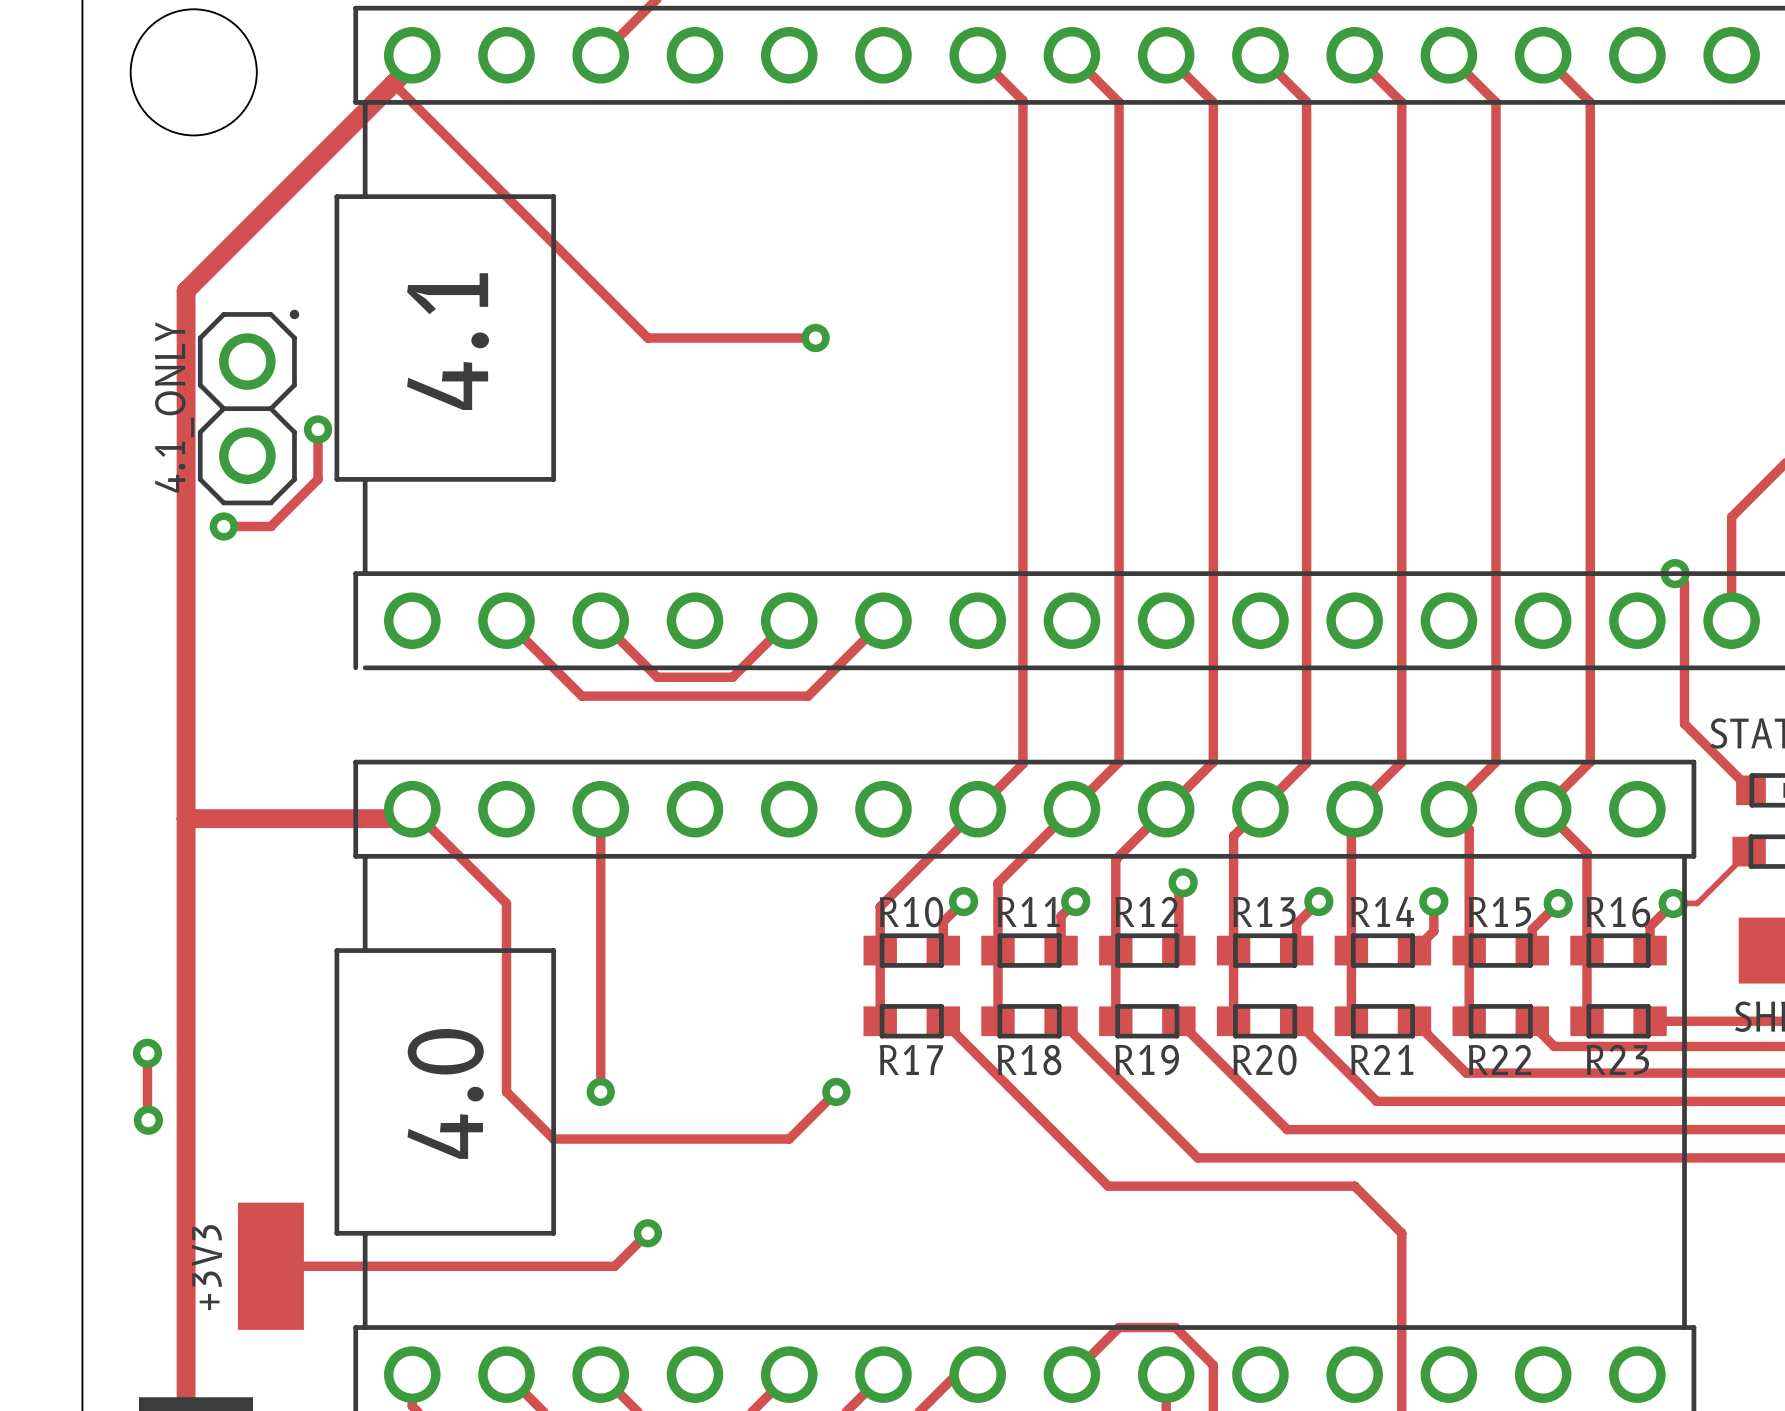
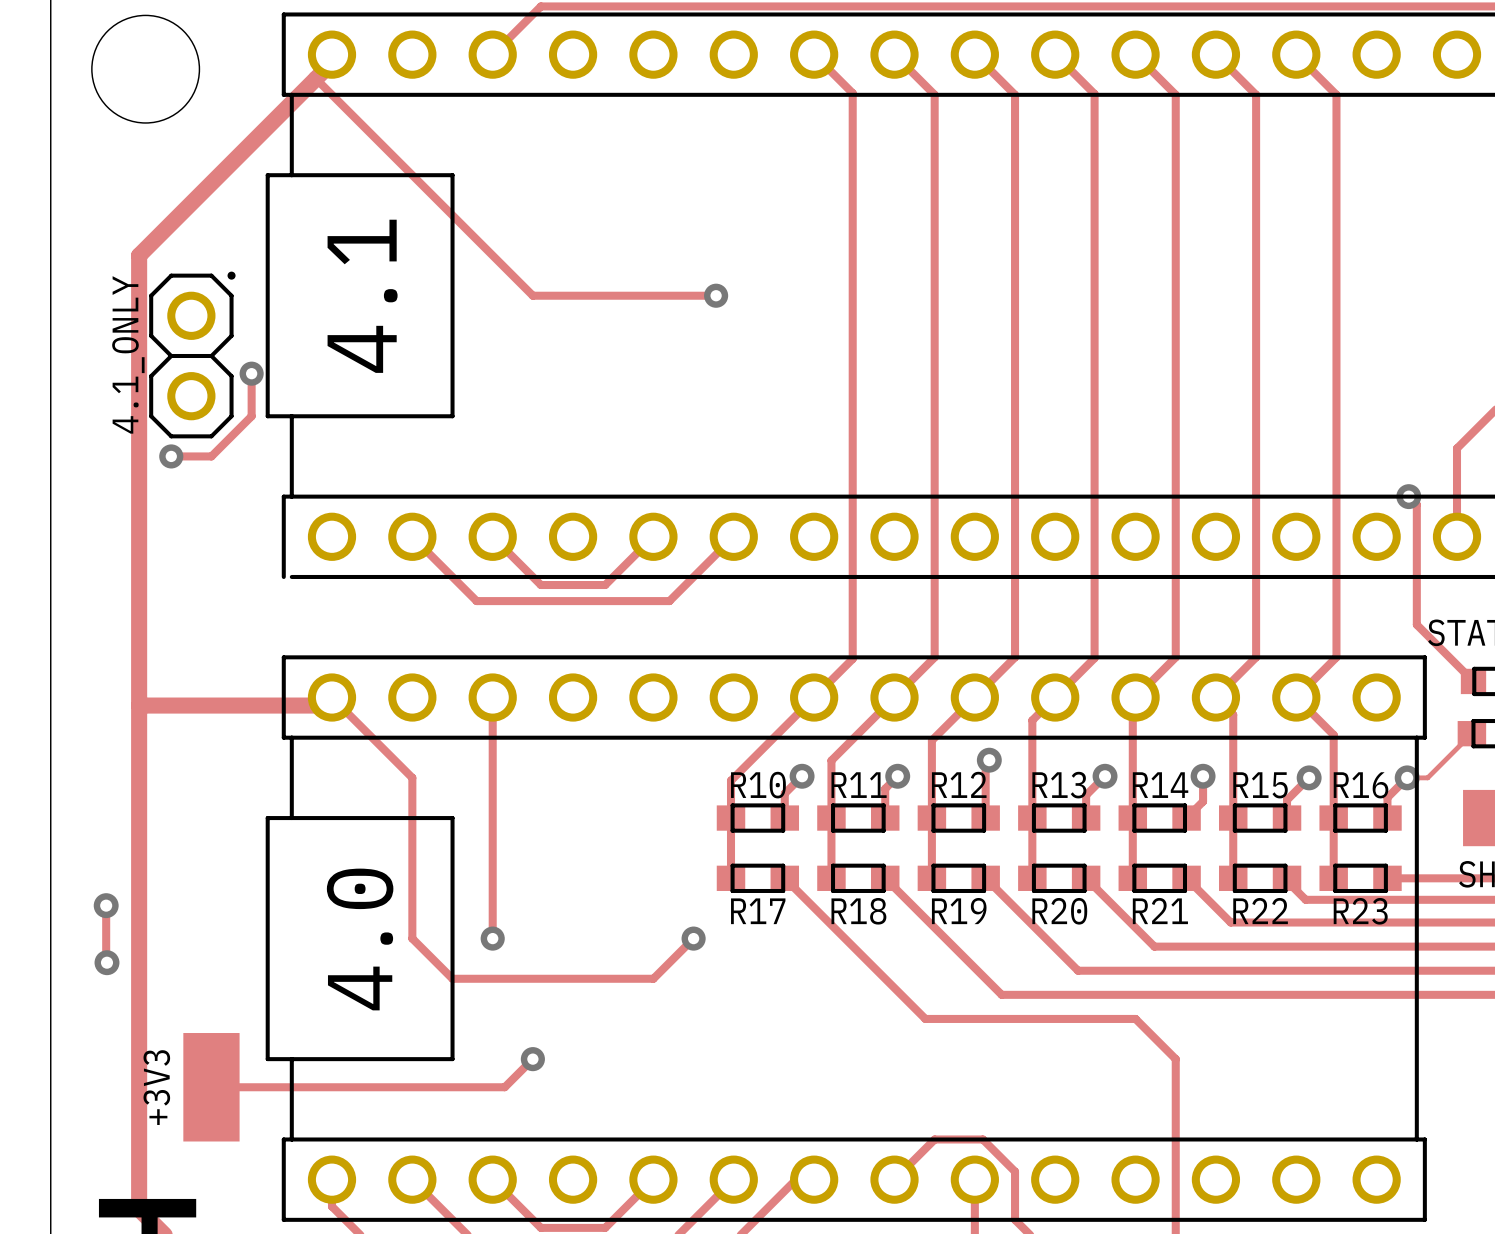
track: none -> (675, 295) (716, 295)
via position: (815, 338) -> (716, 295)

